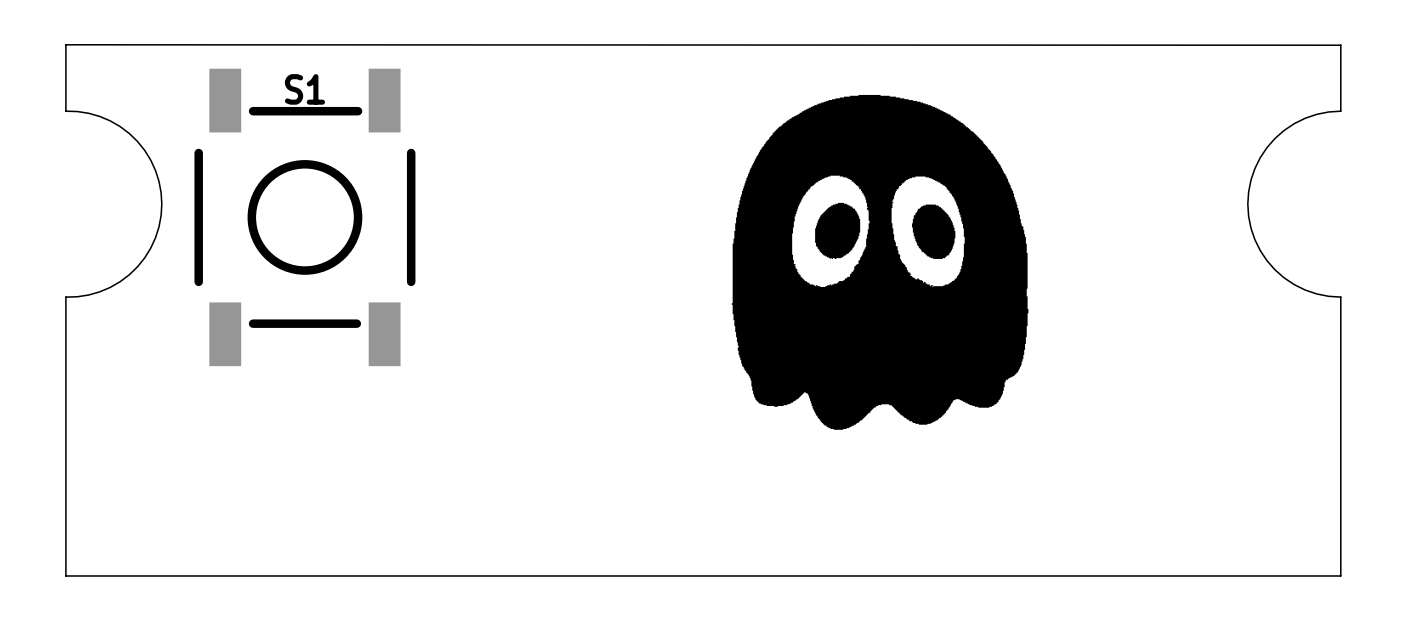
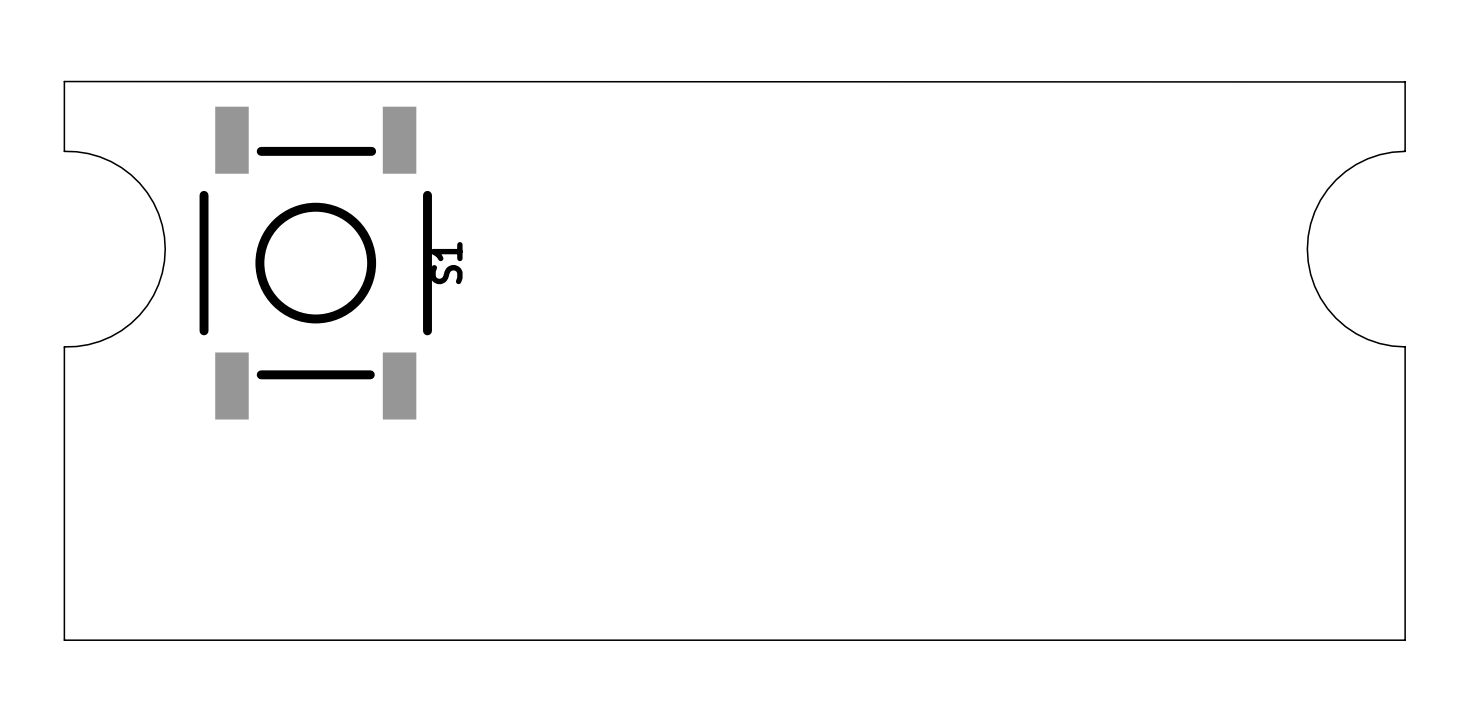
S1 name rotation: 0° (304, 89) -> 90° counterclockwise (446, 263)
S1 name position: S1 (304, 89) -> S1 (446, 263)
drawing: [731, 94, 1029, 430] -> none

